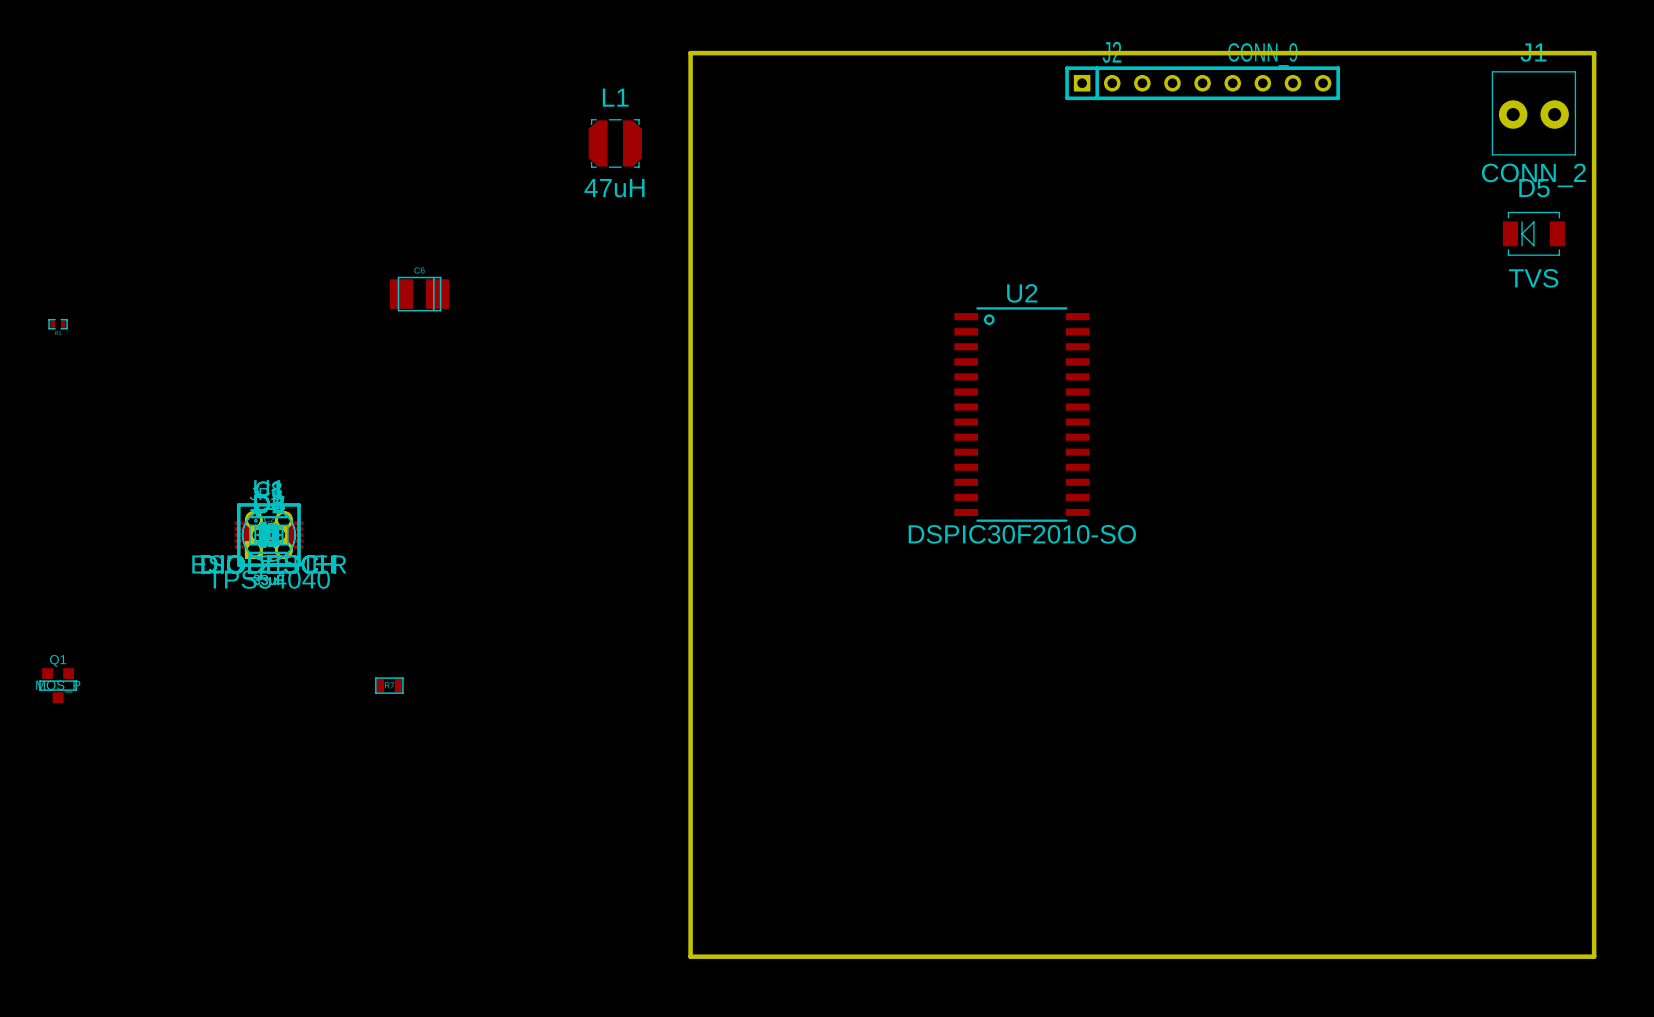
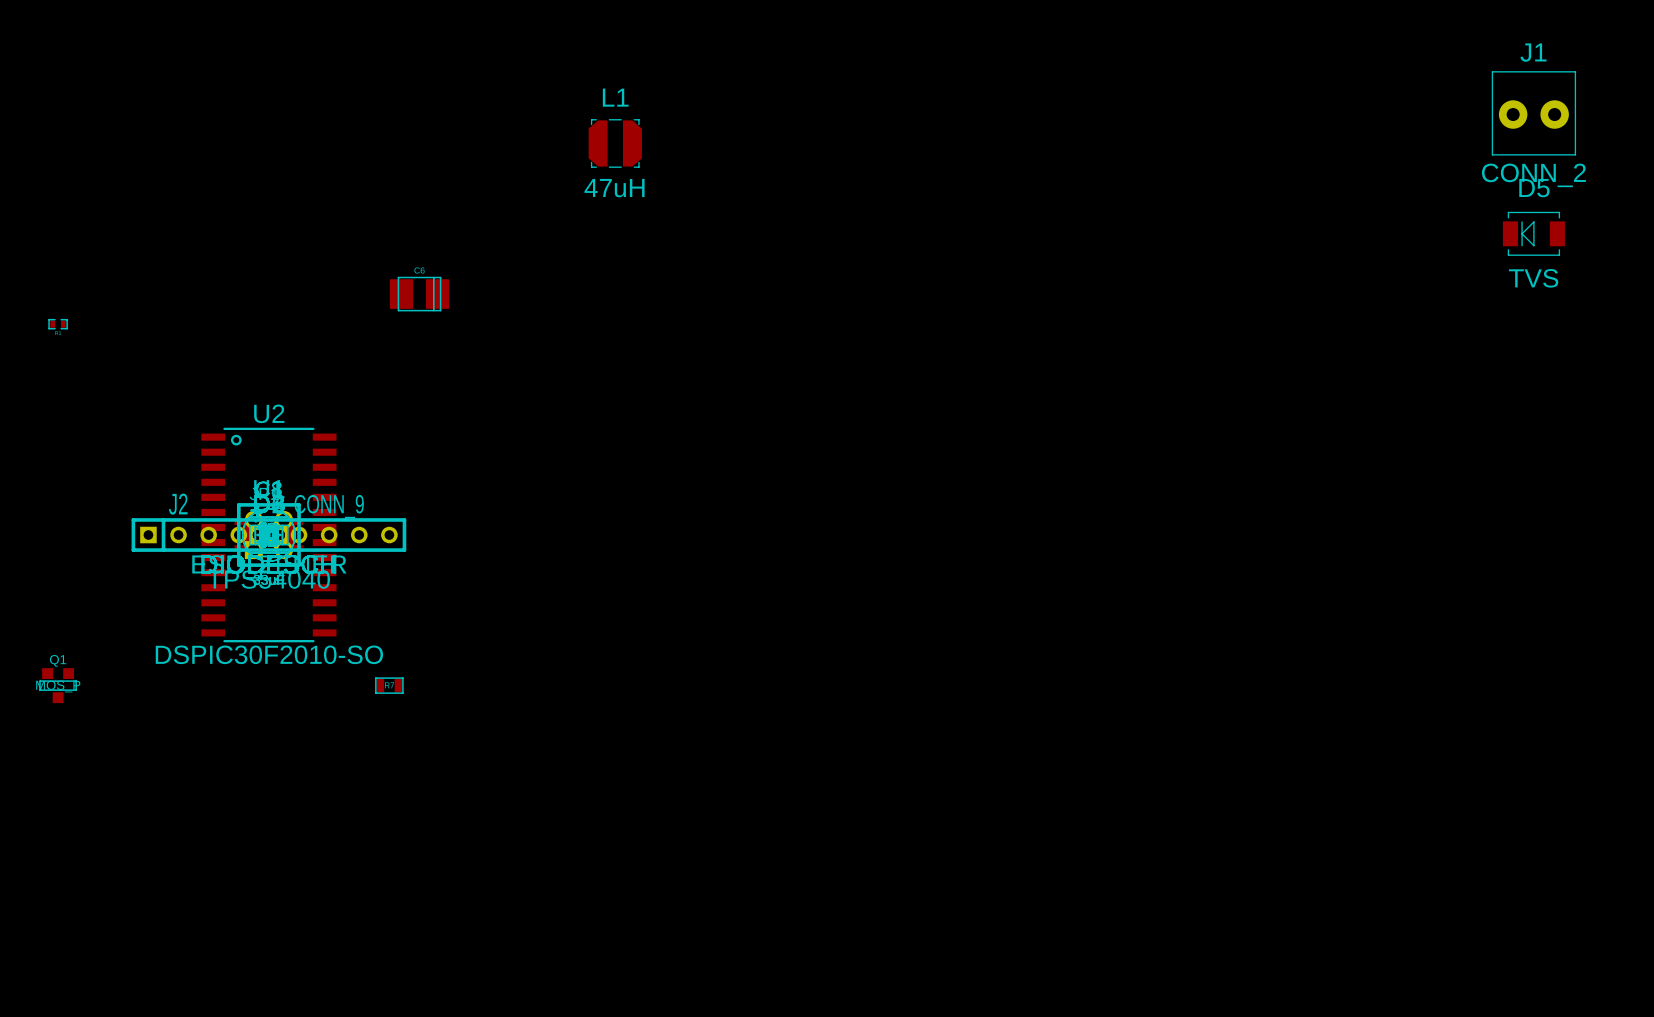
board edge: (690, 53) (1594, 53) (1594, 956) (690, 956) (690, 53) -> none
J2 position: (1202, 83) -> (268, 535)
U2 position: (1021, 414) -> (268, 535)

